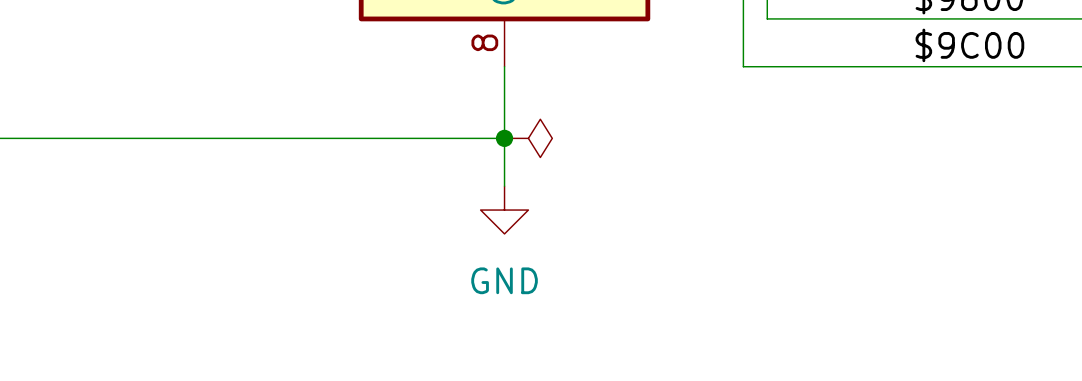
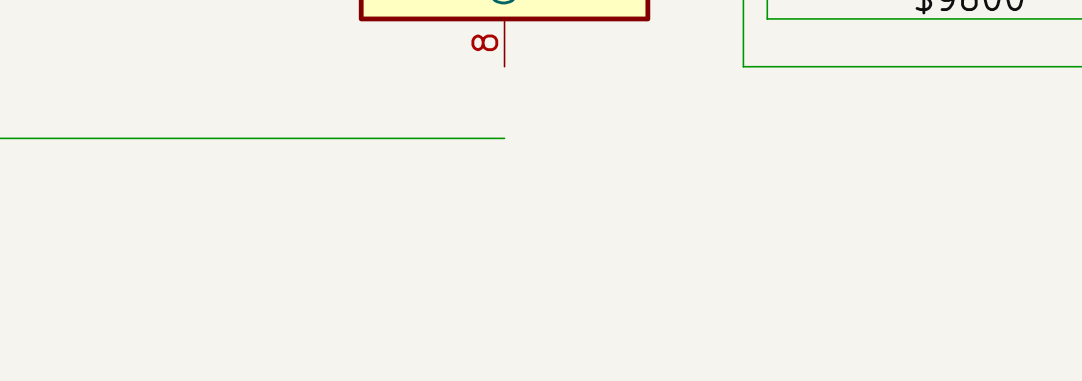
label: $9C00 (969, 45) -> none
wire: (504, 66) (504, 186) -> none
junction: (504, 138) -> none
power symbol: (528, 138) -> none
power symbol: GND (504, 210) -> none

